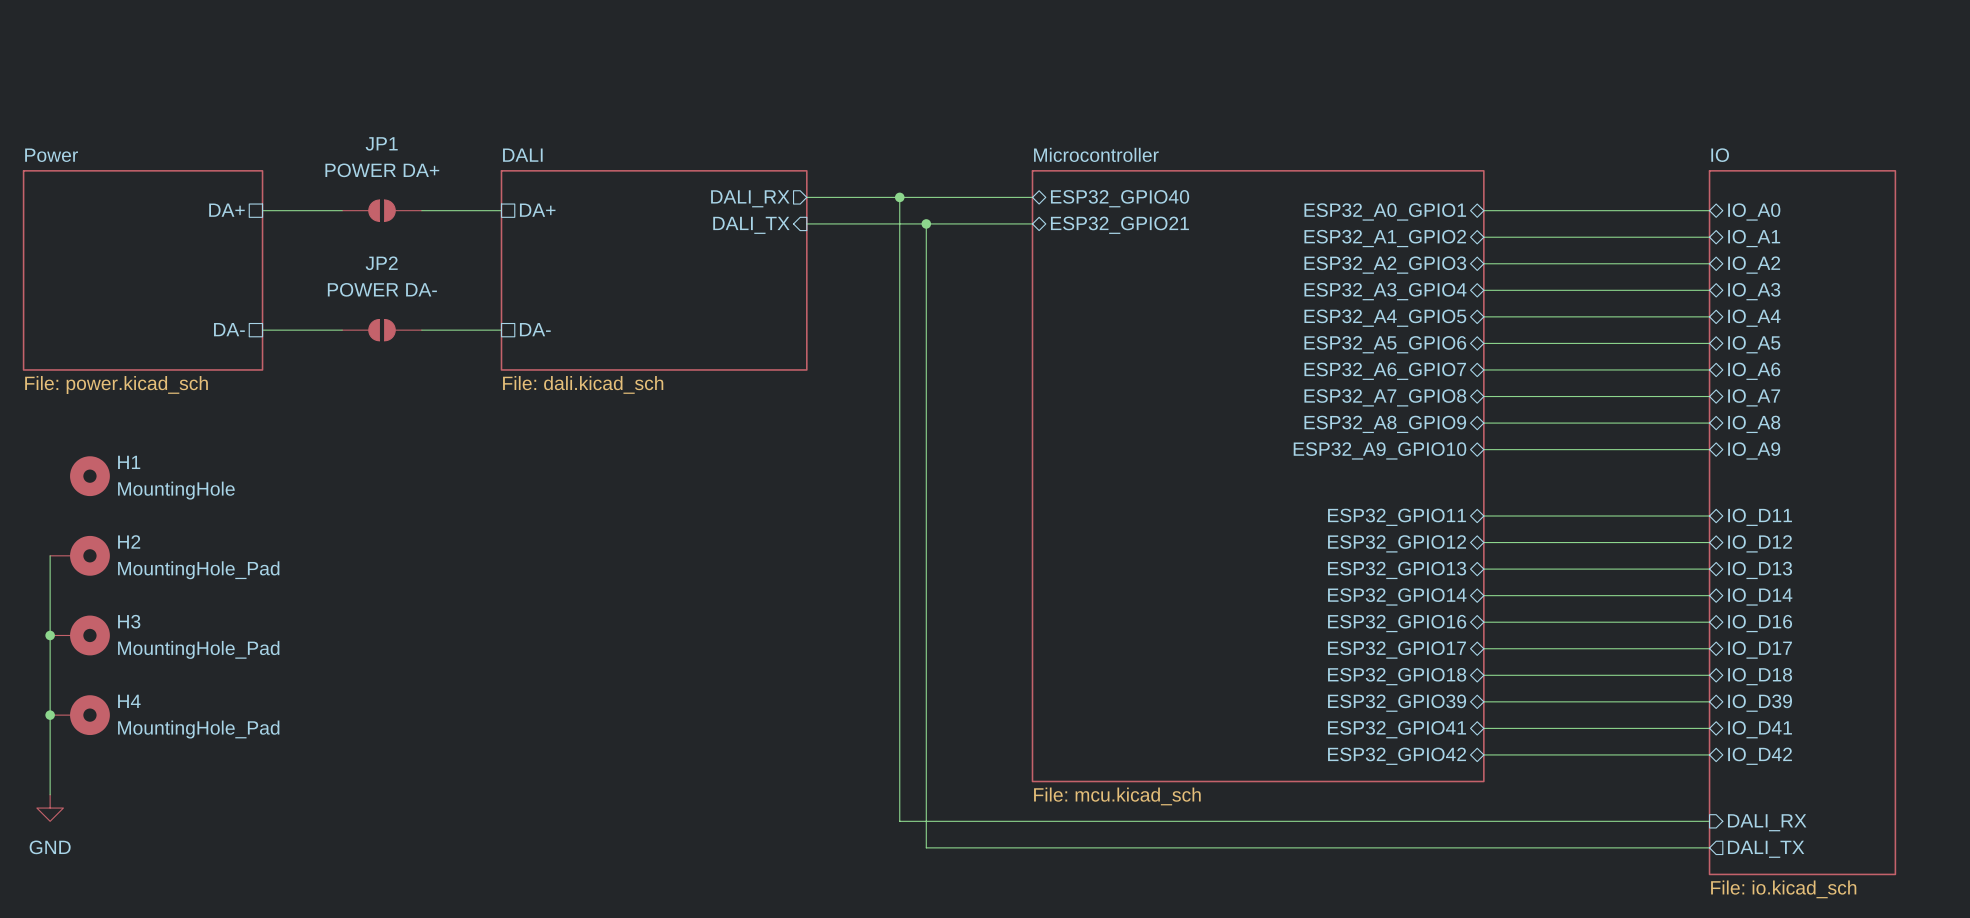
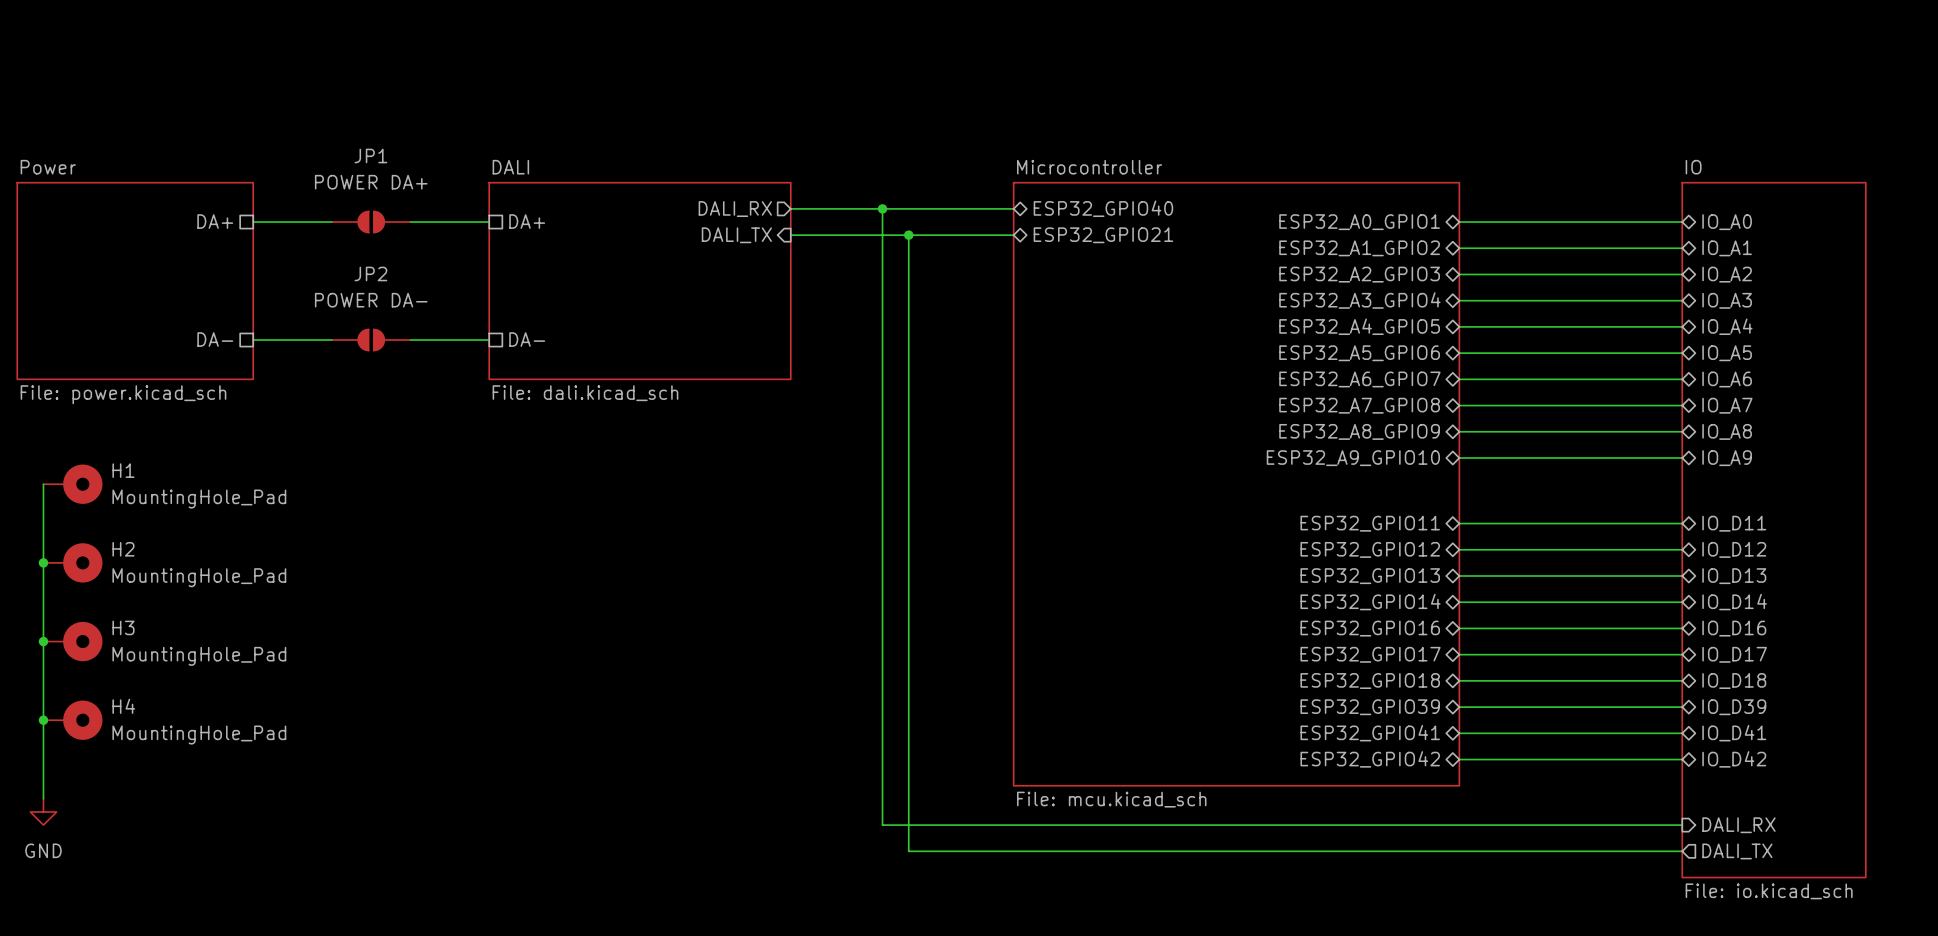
H1 symbol: [70, 456, 110, 497] -> [43, 464, 103, 504]
wire: none -> (43, 484) (43, 562)
H1 value: MountingHole (176, 490) -> MountingHole_Pad (199, 499)
junction: none -> (43, 562)

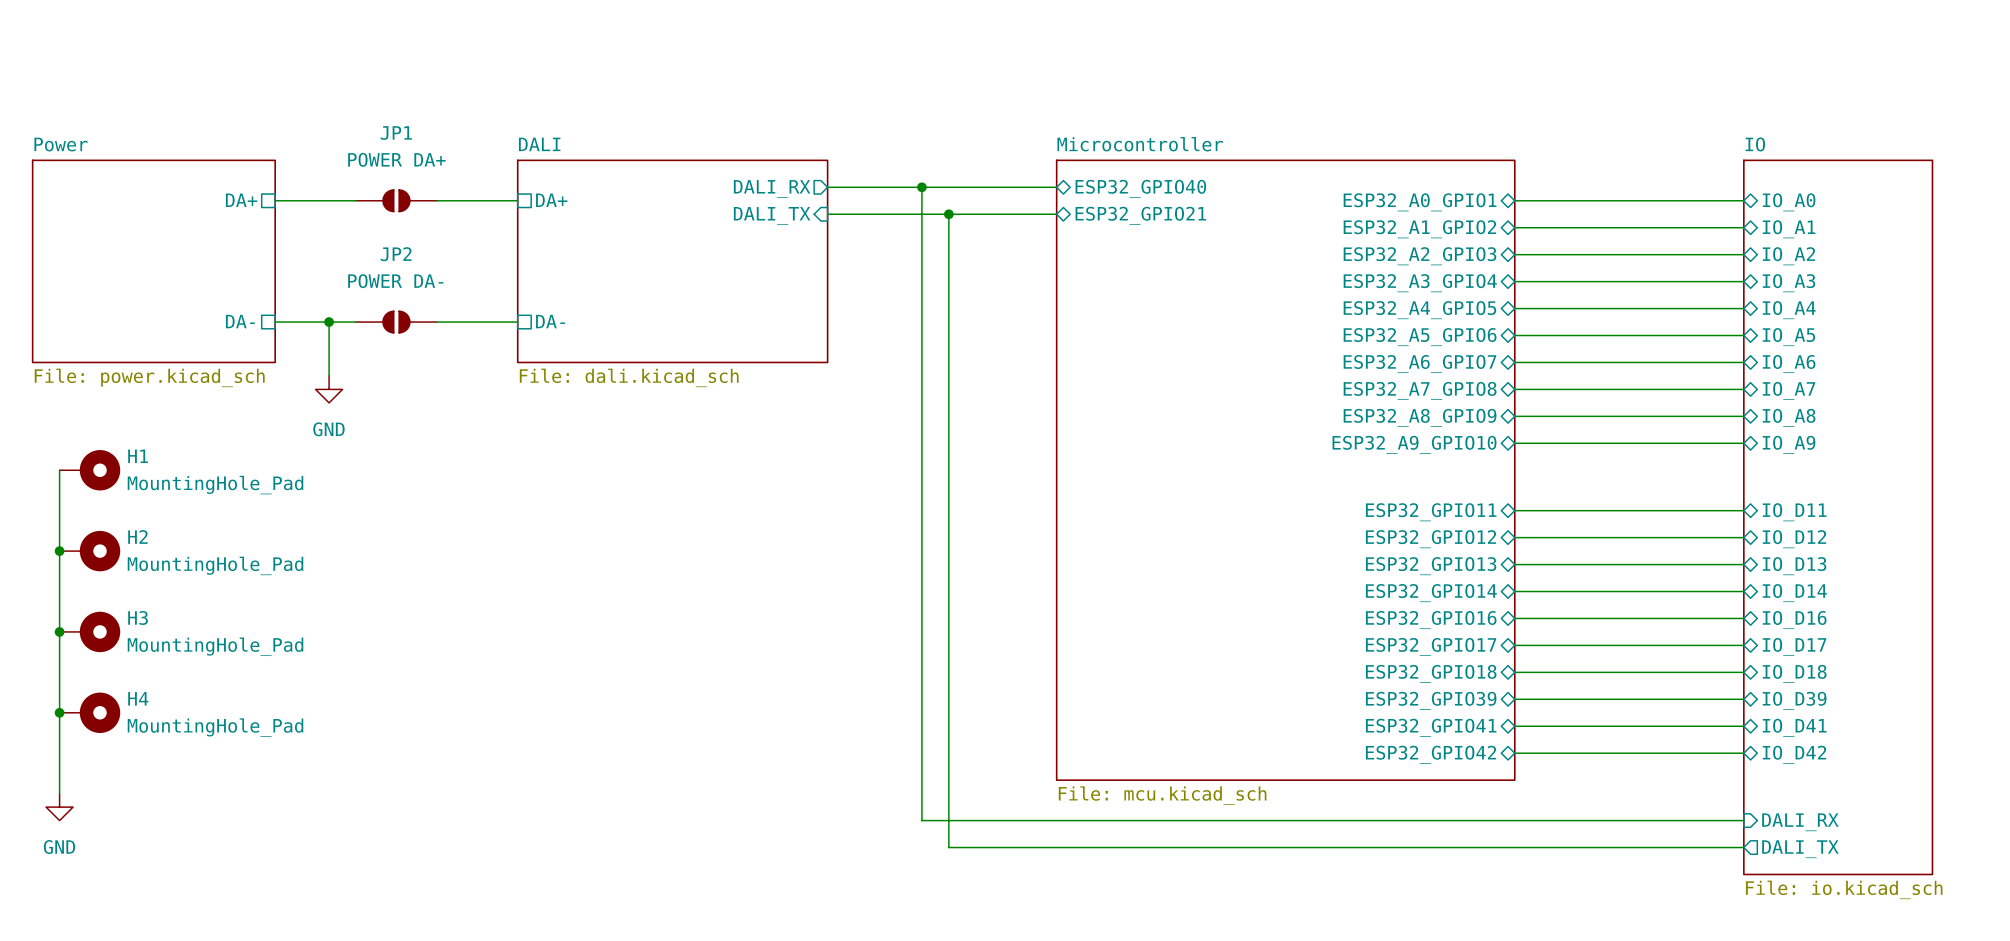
wire: none -> (329, 322) (329, 375)
junction: none -> (329, 322)
power symbol: none -> GND (329, 389)

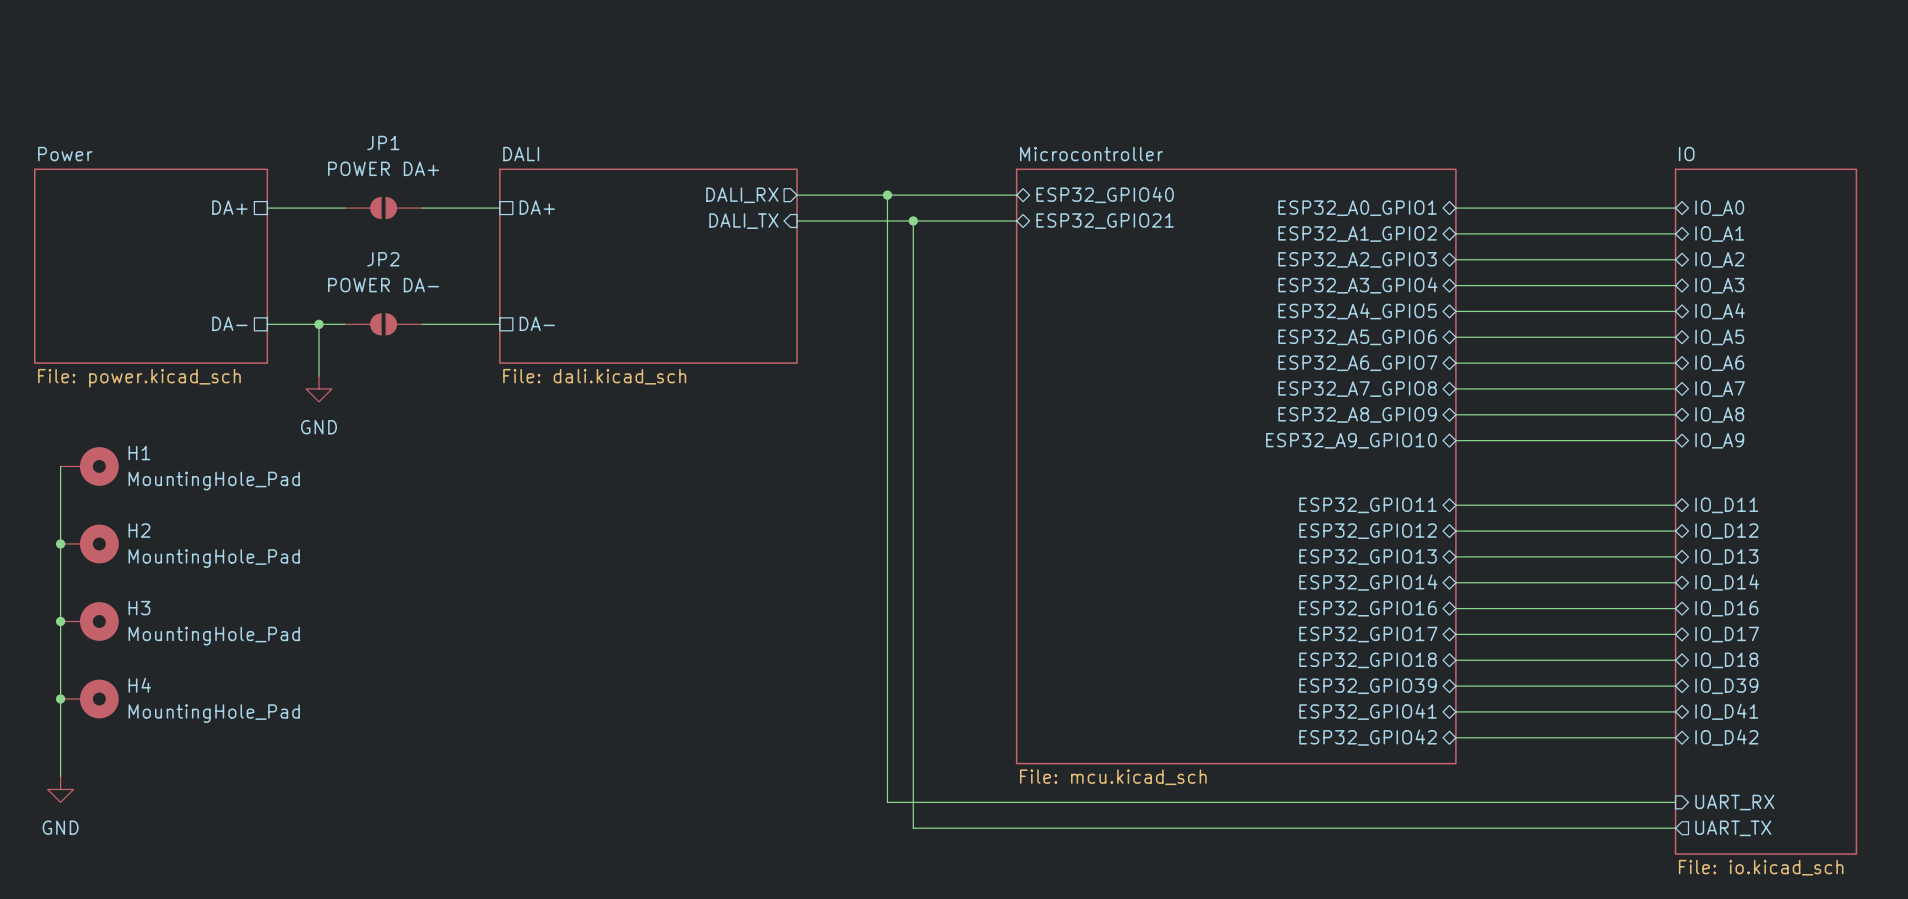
sheet pin: DALI_RX (1800, 822) -> UART_RX (1734, 802)
sheet pin: DALI_TX (1800, 849) -> UART_TX (1733, 828)

